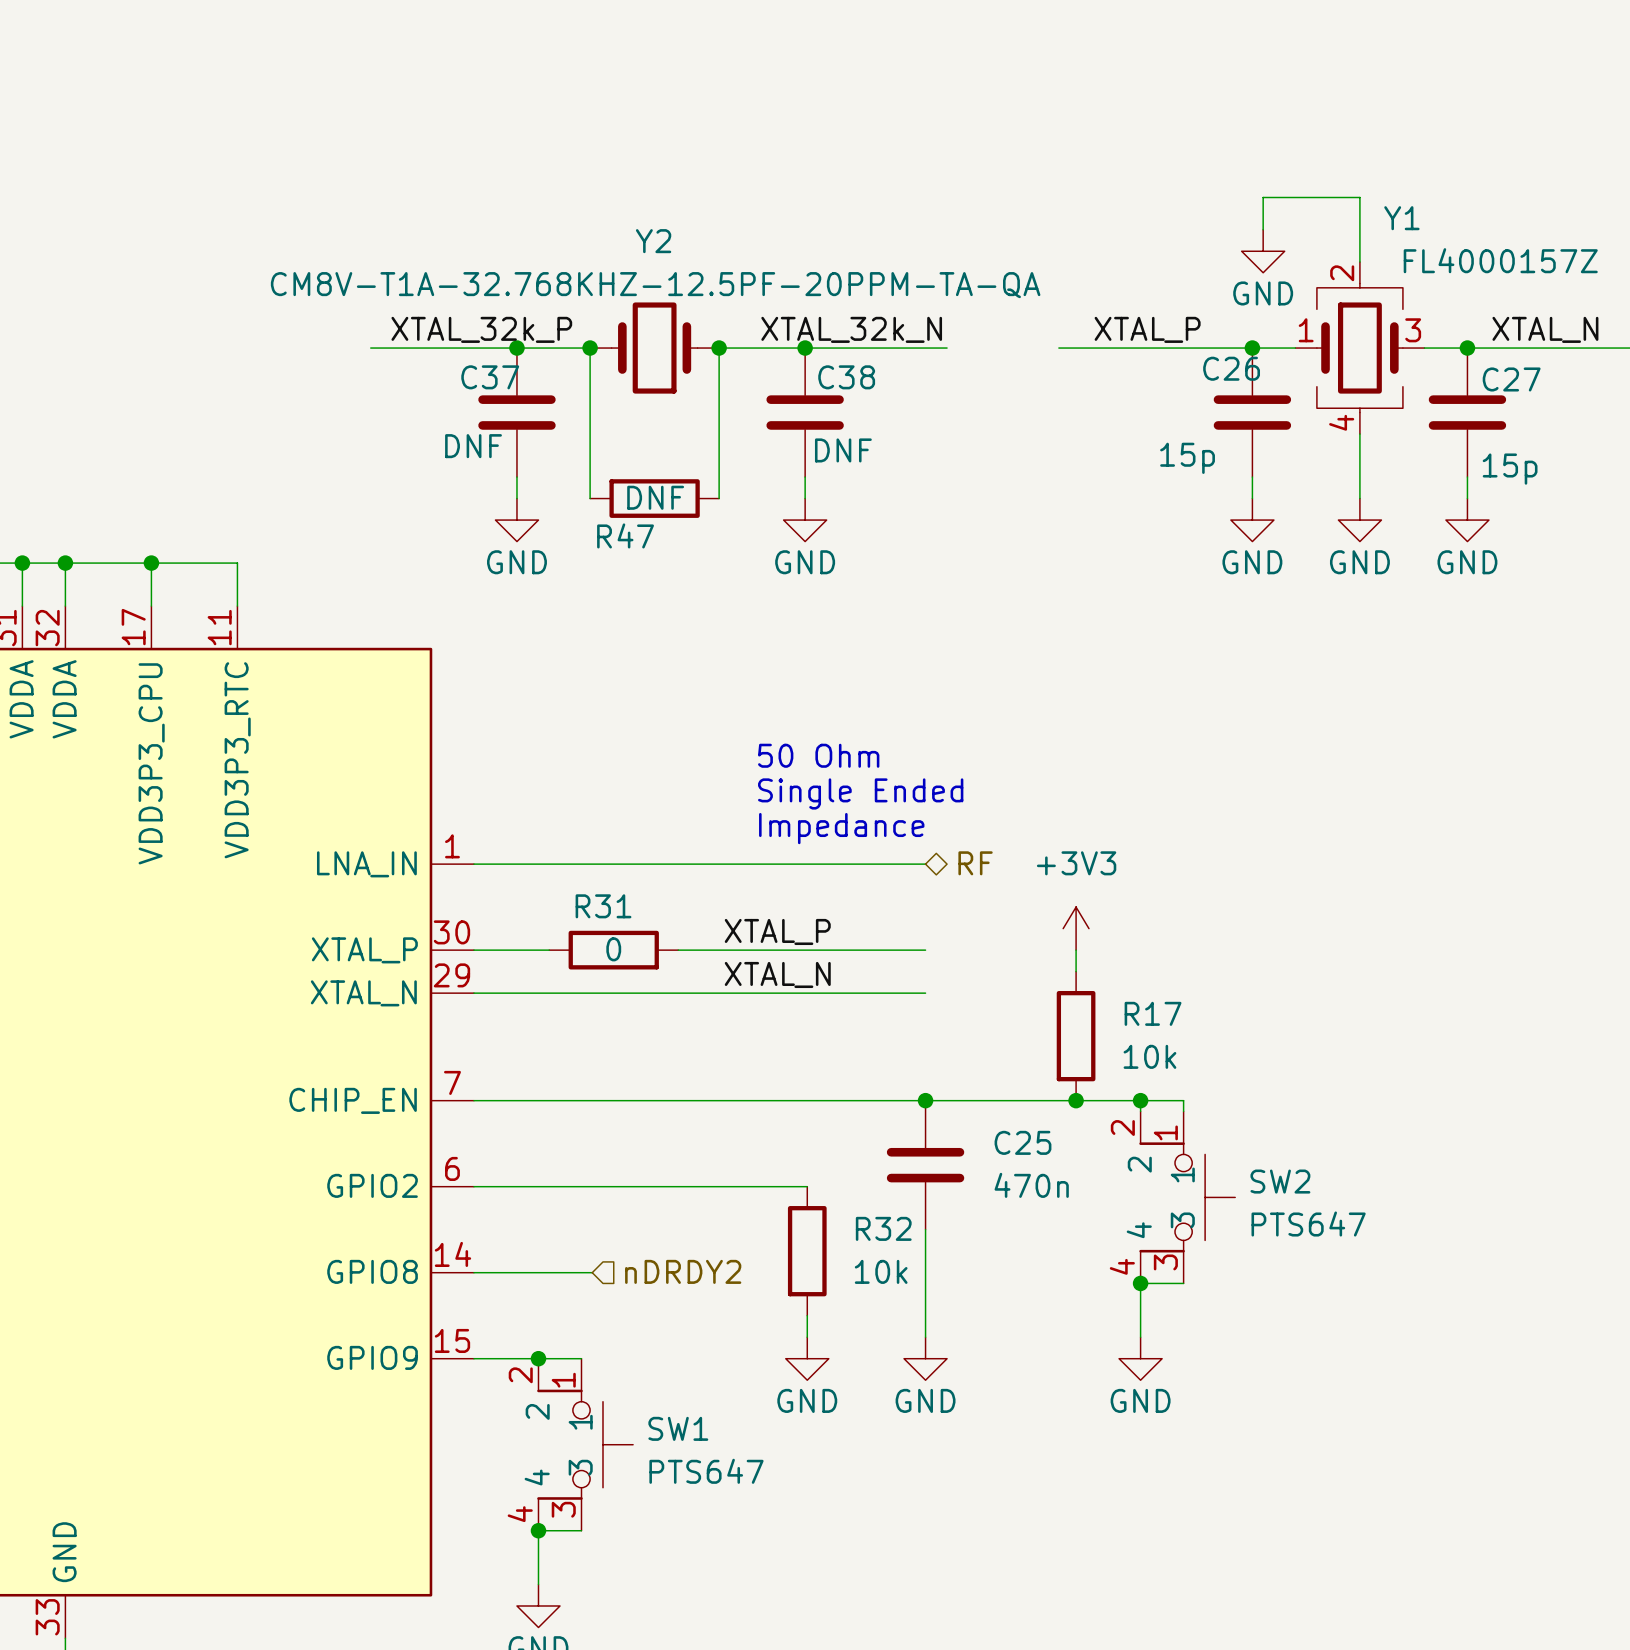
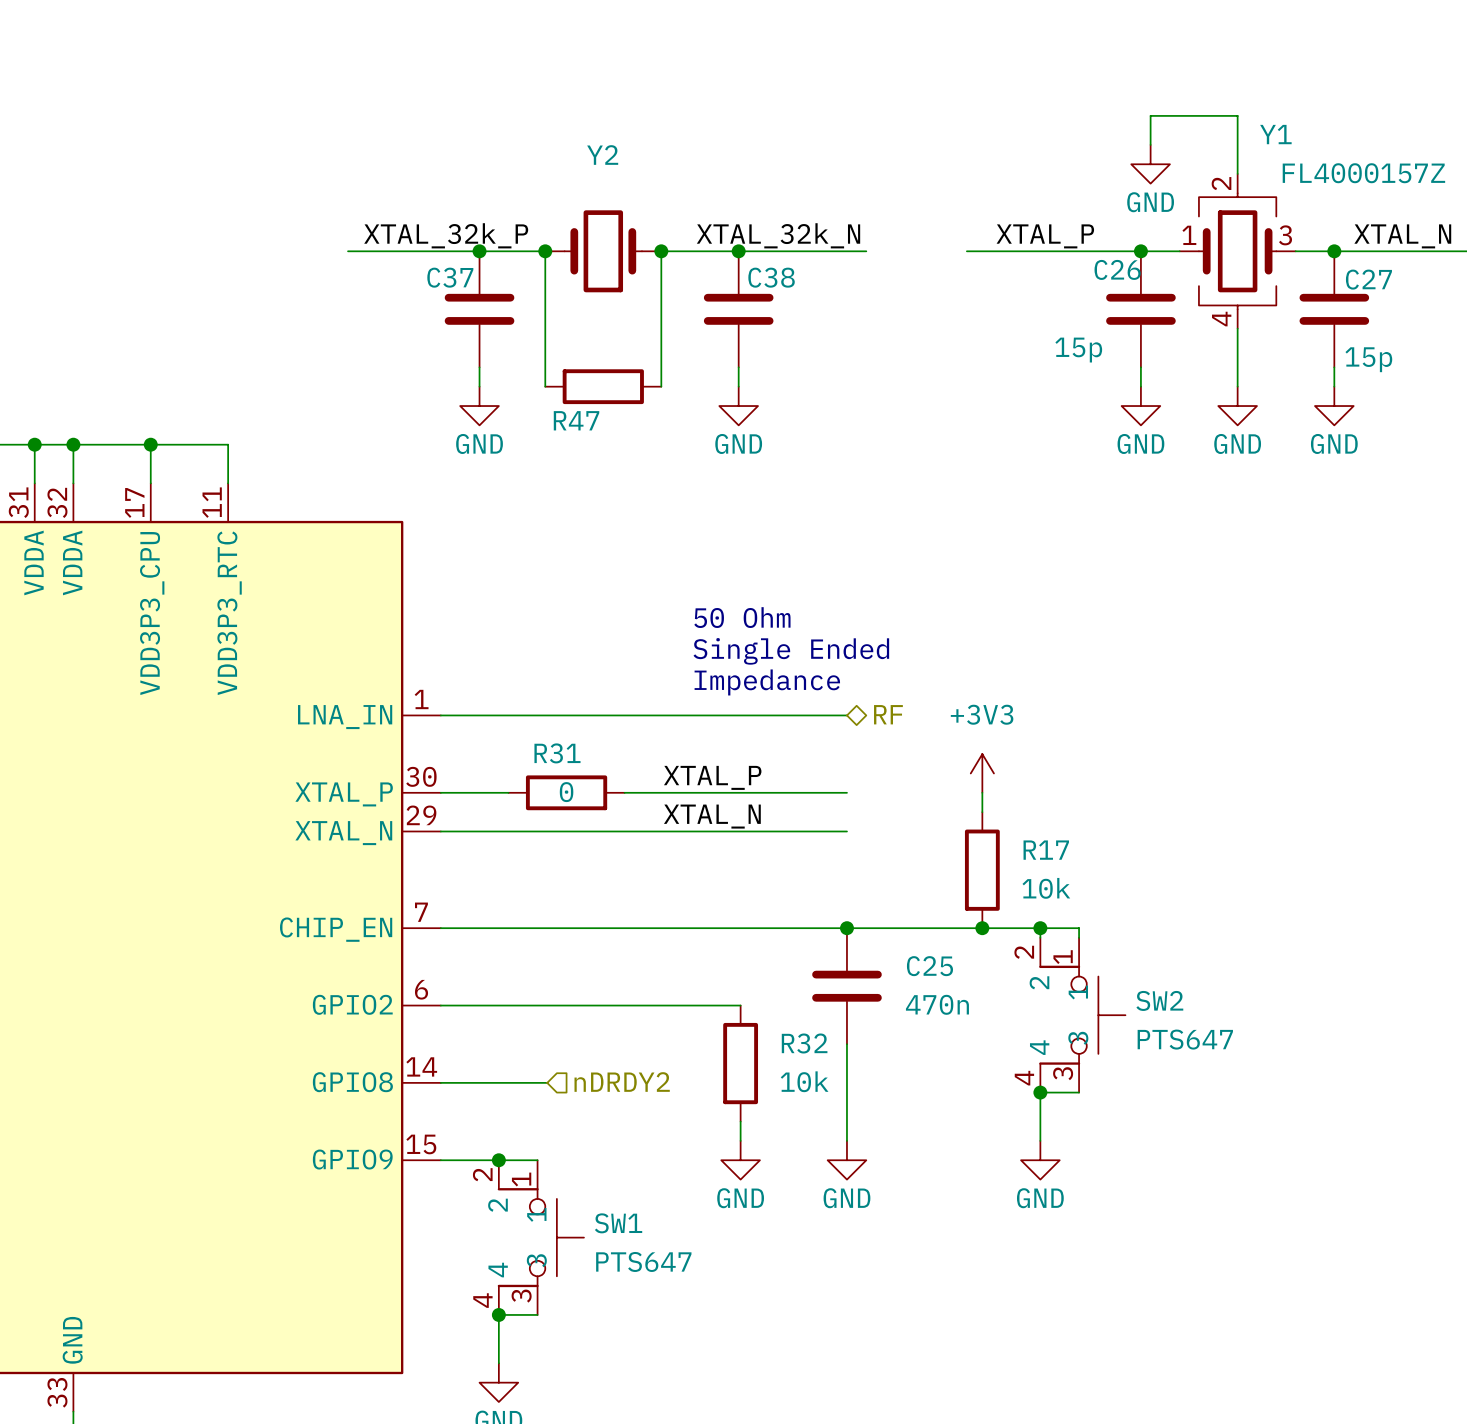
Y2 value: CM8V-T1A-32.768KHZ-12.5PF-20PPM-TA-QA (655, 285) -> none
C37 value: DNF (473, 446) -> none
C38 value: DNF (843, 450) -> none
R47 value: DNF (655, 497) -> none

